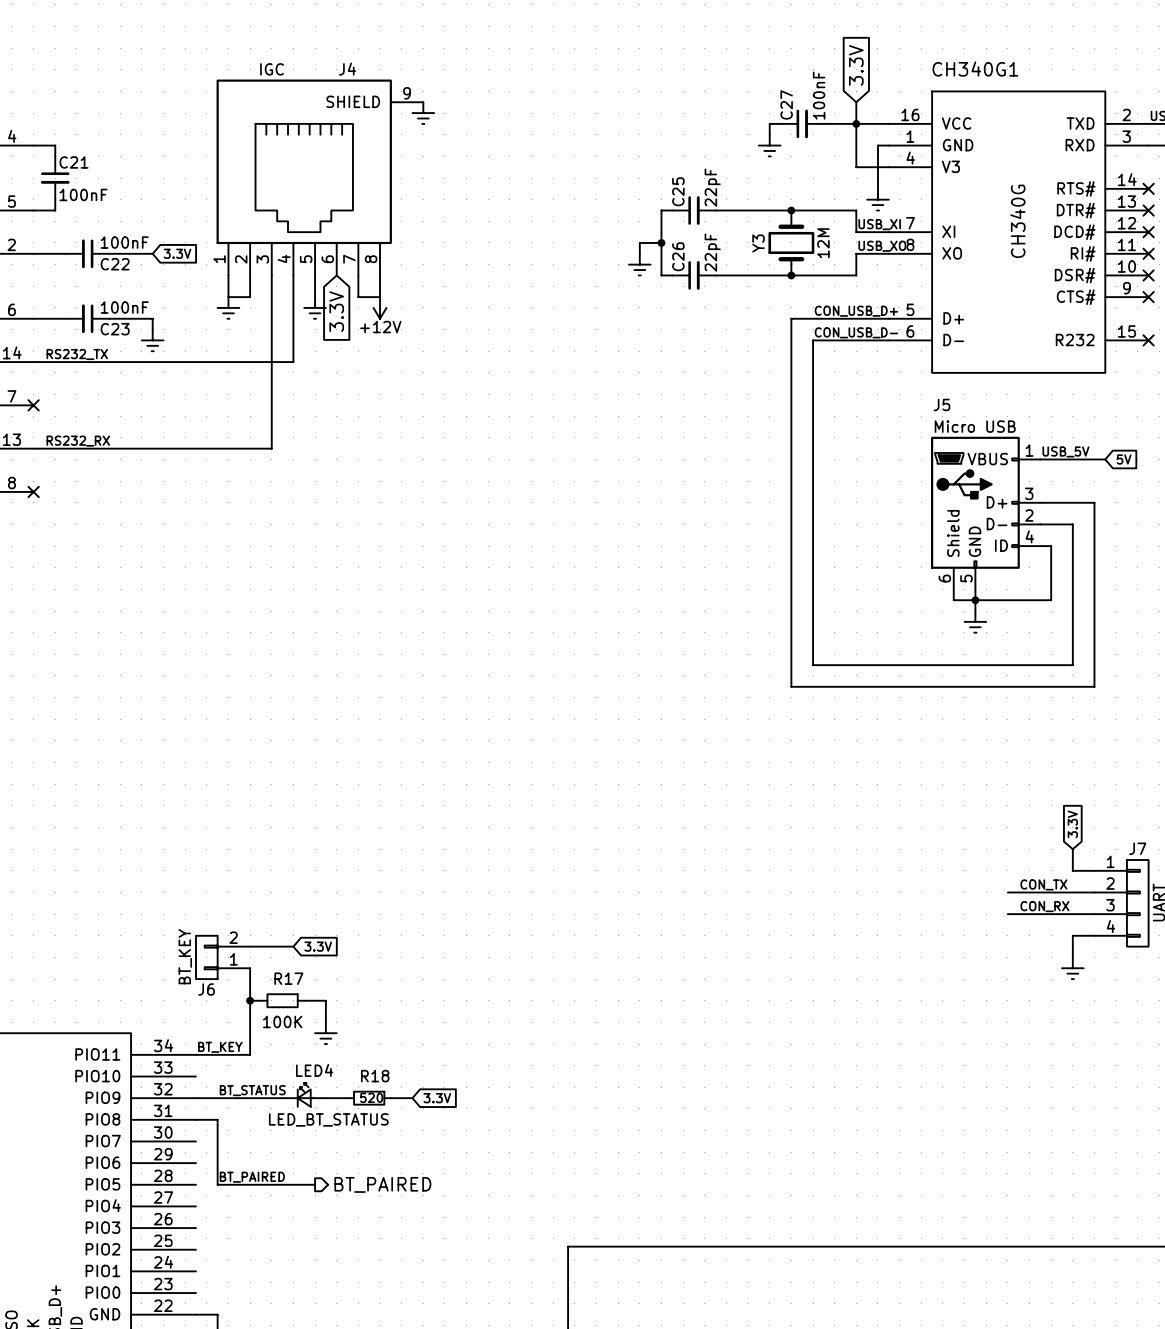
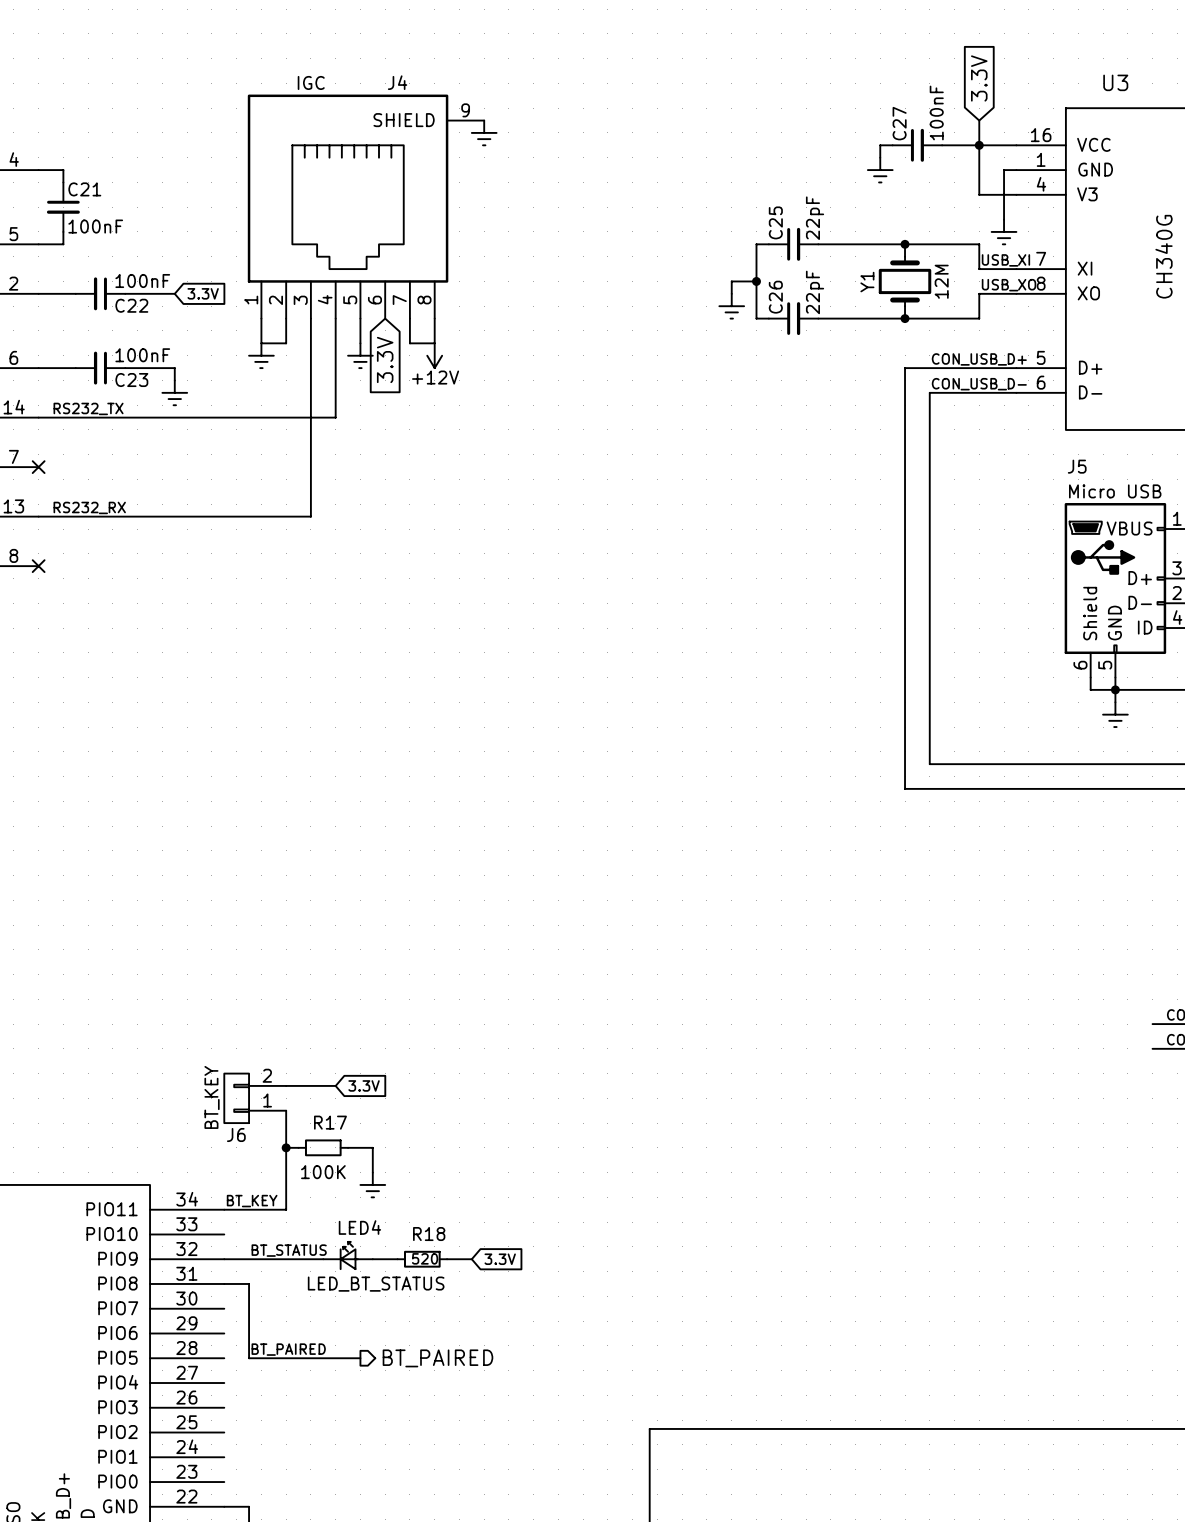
CH340G1 name: CH340G1 (975, 68) -> U3 (1115, 82)
Y3 name: Y3 (758, 243) -> Y1 (867, 282)

